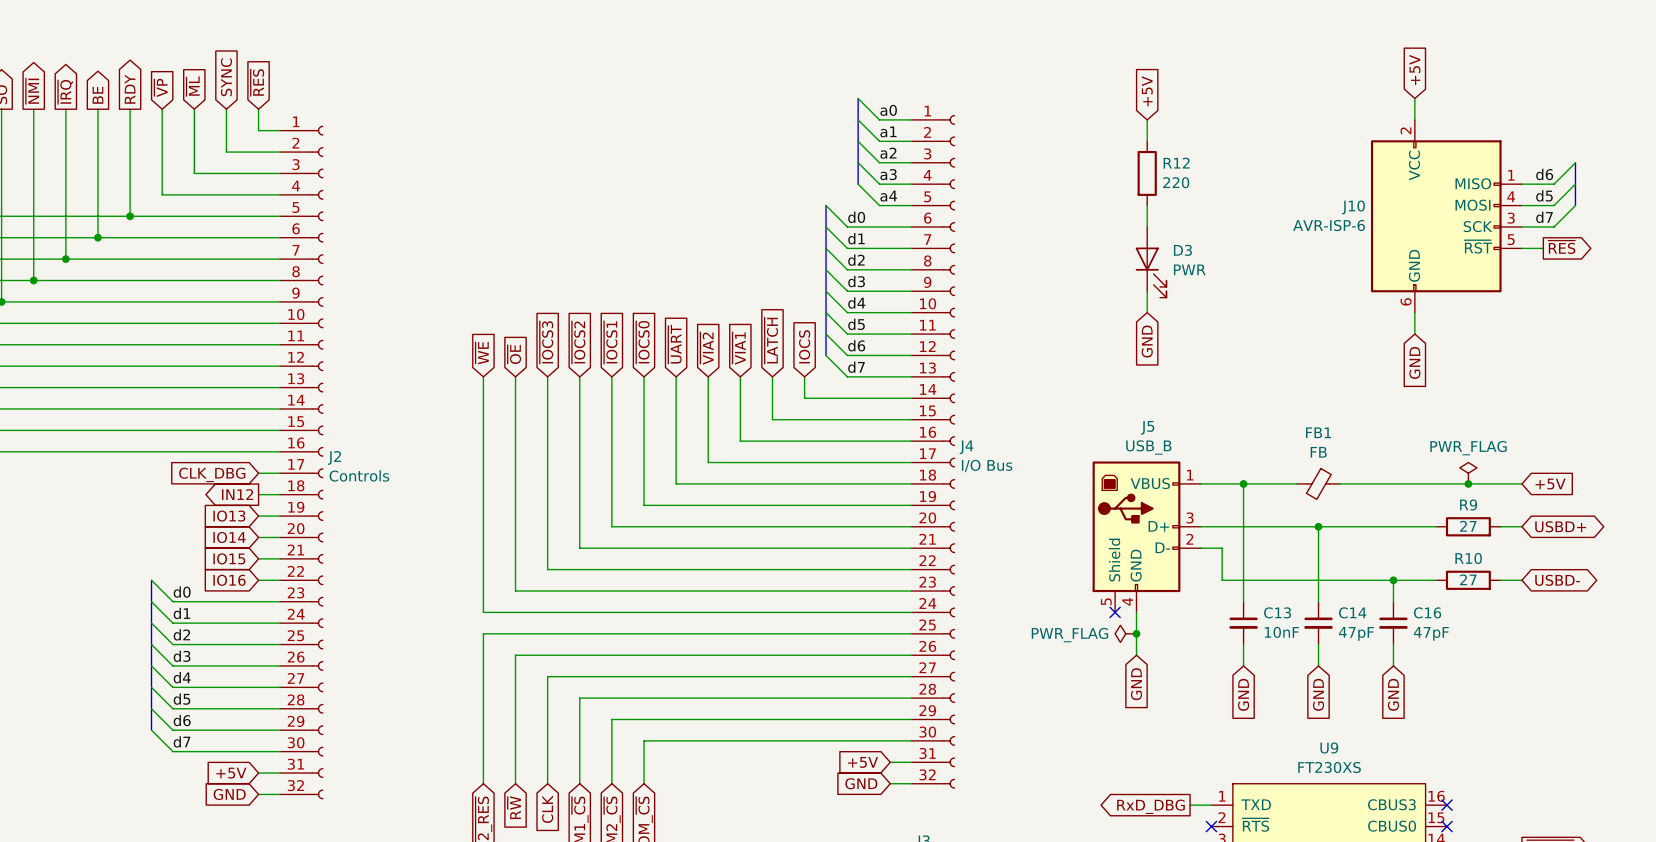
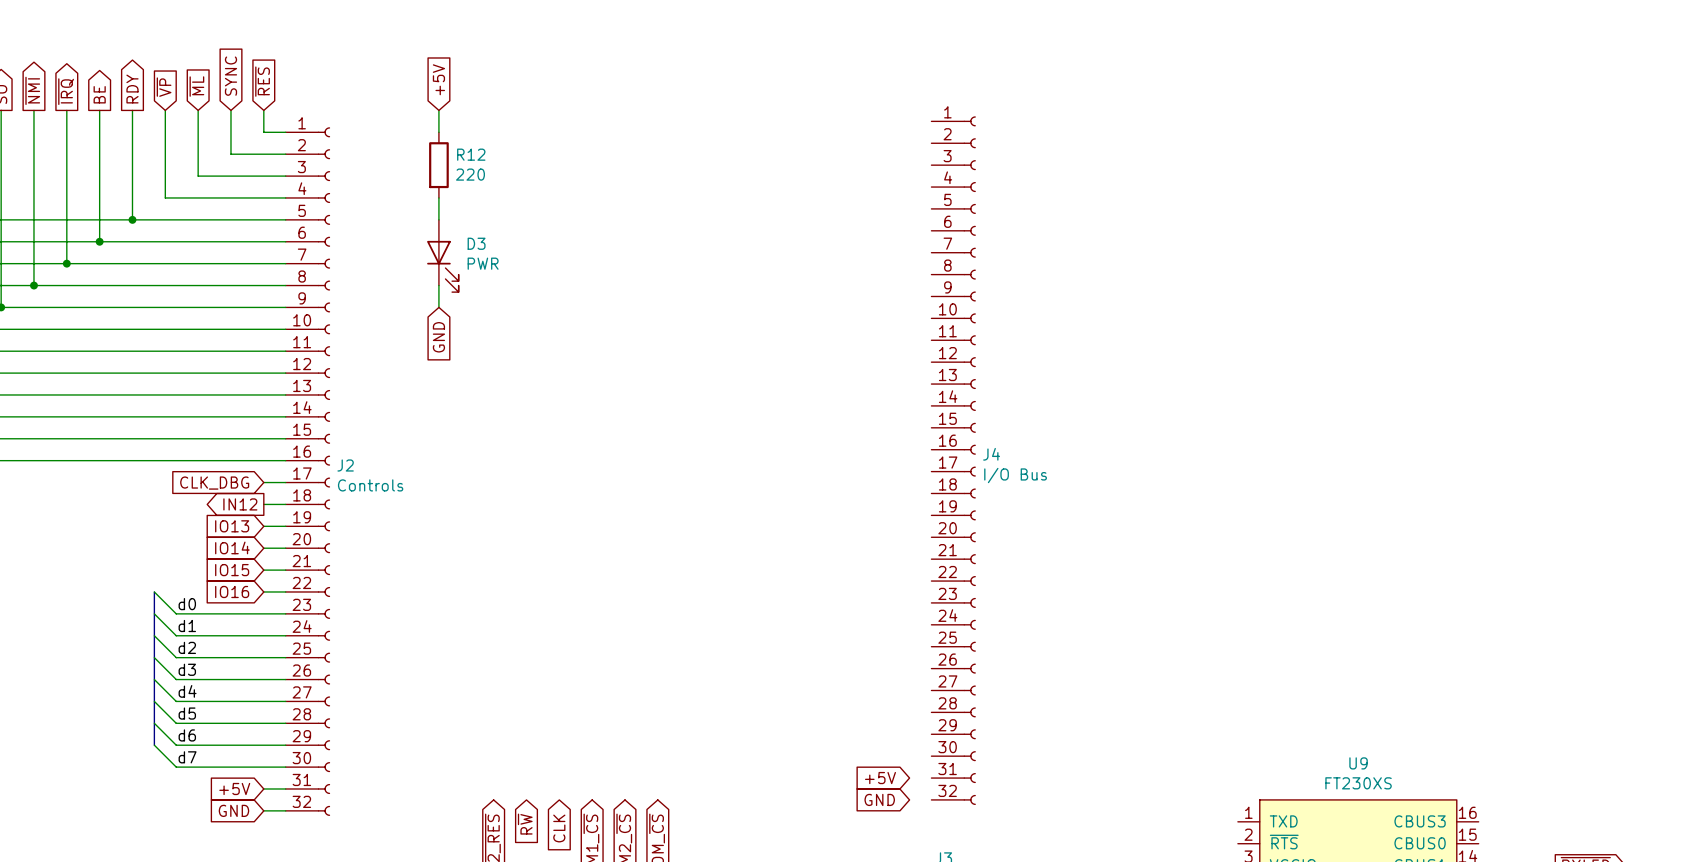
global label: +5V (1414, 69) -> none
global label: none -> +5V (438, 79)
global label: +5V (1147, 91) -> none
wire: (858, 98) (879, 119) (911, 119) -> none
bus: (858, 98) (858, 184) -> none
wire: (1414, 98) (1414, 119) -> none
wire: none -> (438, 110) (438, 132)
label: a0 (888, 110) -> none
wire: (858, 119) (879, 141) (911, 141) -> none
wire: (1147, 119) (1147, 141) -> none
label: a1 (888, 131) -> none
wire: (858, 141) (879, 162) (911, 162) -> none
label: a2 (888, 153) -> none
wire: (858, 162) (879, 184) (911, 184) -> none
wire: (1575, 162) (1554, 184) (1521, 184) -> none
bus: (1575, 162) (1575, 205) -> none
R12 position: (1147, 173) -> (438, 165)
label: a3 (888, 174) -> none
label: d6 (1544, 174) -> none
wire: (858, 184) (879, 205) (911, 205) -> none
wire: (1575, 184) (1554, 205) (1521, 205) -> none
wire: none -> (438, 197) (438, 219)
label: d5 (1544, 195) -> none
label: a4 (888, 196) -> none
wire: (826, 205) (847, 226) (911, 226) -> none
bus: (826, 205) (826, 355) -> none
wire: (1147, 205) (1147, 226) -> none
wire: (1575, 205) (1554, 226) (1521, 226) -> none
J10: AVR-ISP-6 (1446, 216) -> none
label: d0 (856, 217) -> none
label: d7 (1544, 217) -> none
wire: (826, 226) (847, 248) (911, 248) -> none
label: d1 (856, 238) -> none
global label: ~{RES} (1561, 247) -> none
wire: (826, 248) (847, 269) (911, 269) -> none
wire: (1521, 248) (1543, 248) -> none
label: d2 (856, 260) -> none
D3 position: (1151, 262) -> (442, 255)
wire: (826, 269) (847, 291) (911, 291) -> none
wire: none -> (438, 285) (438, 307)
label: d3 (856, 281) -> none
wire: (826, 291) (847, 312) (911, 312) -> none
wire: (1147, 291) (1147, 312) -> none
label: d4 (856, 302) -> none
wire: (826, 312) (847, 334) (911, 334) -> none
wire: (1414, 312) (1414, 334) -> none
label: d5 (856, 324) -> none
global label: none -> GND (438, 337)
wire: (826, 334) (847, 355) (911, 355) -> none
global label: ~{LATCH} (771, 340) -> none
global label: GND (1147, 341) -> none
global label: ~{IOCS3} (546, 342) -> none
global label: ~{IOCS2} (578, 342) -> none
global label: ~{IOCS1} (610, 342) -> none
global label: ~{IOCS0} (642, 342) -> none
global label: ~{UART} (674, 344) -> none
label: d6 (856, 345) -> none
global label: IOCS (804, 346) -> none
global label: ~{VIA2} (707, 348) -> none
global label: ~{VIA1} (739, 348) -> none
global label: ~{WE} (482, 353) -> none
global label: ~{OE} (514, 354) -> none
wire: (826, 355) (847, 376) (911, 376) -> none
global label: GND (1414, 362) -> none
label: d7 (856, 367) -> none
wire: (483, 376) (483, 612) (911, 612) -> none
wire: (515, 376) (515, 591) (911, 591) -> none
wire: (547, 376) (547, 569) (911, 569) -> none
wire: (579, 376) (579, 548) (911, 548) -> none
wire: (611, 376) (611, 526) (911, 526) -> none
wire: (644, 376) (644, 505) (911, 505) -> none
wire: (676, 376) (676, 483) (911, 483) -> none
wire: (708, 376) (708, 462) (911, 462) -> none
wire: (740, 376) (740, 441) (911, 441) -> none
wire: (772, 376) (772, 419) (911, 419) -> none
wire: (804, 376) (804, 398) (911, 398) -> none
power symbol: PWR_FLAG (1468, 473) -> none
wire: (1200, 483) (1297, 483) -> none
wire: (1243, 483) (1243, 601) -> none
junction: (1243, 483) -> none
FB1: FB (1318, 483) -> none
wire: (1339, 483) (1521, 483) -> none
junction: (1468, 483) -> none
global label: +5V (1550, 484) -> none
wire: (1200, 526) (1436, 526) -> none
wire: (1318, 526) (1318, 601) -> none
junction: (1318, 526) -> none
R9: 27 (1468, 526) -> none
wire: (1500, 526) (1521, 526) -> none
global label: USBD+ (1560, 526) -> none
J5: USB_B (1146, 536) -> none
wire: (1200, 548) (1222, 548) (1222, 580) (1436, 580) -> none
wire: (1393, 580) (1393, 601) -> none
junction: (1393, 580) -> none
R10: 27 (1468, 580) -> none
wire: (1500, 580) (1521, 580) -> none
global label: USBD- (1557, 580) -> none
no-connect mark: (1115, 612) -> none
wire: (1136, 612) (1136, 655) -> none
C13: 10nF (1243, 623) -> none
C14: 47pF (1318, 623) -> none
C16: 47pF (1393, 623) -> none
wire: (911, 633) (483, 633) (483, 783) -> none
power symbol: PWR_FLAG (1125, 633) -> none
junction: (1136, 633) -> none
wire: (1243, 644) (1243, 665) -> none
wire: (1318, 644) (1318, 665) -> none
wire: (1393, 644) (1393, 665) -> none
wire: (911, 655) (515, 655) (515, 783) -> none
wire: (911, 676) (547, 676) (547, 783) -> none
global label: GND (1136, 684) -> none
global label: GND (1243, 694) -> none
global label: GND (1318, 694) -> none
global label: GND (1393, 694) -> none
wire: (911, 698) (579, 698) (579, 783) -> none
wire: (911, 719) (611, 719) (611, 783) -> none
wire: (911, 740) (644, 740) (644, 783) -> none
wire: (890, 762) (911, 762) -> none
wire: (890, 783) (911, 783) -> none
wire: (1190, 805) (1211, 805) -> none
no-connect mark: (1446, 805) -> none
global label: RxD_DBG (1150, 806) -> none
no-connect mark: (1211, 826) -> none
no-connect mark: (1446, 826) -> none

